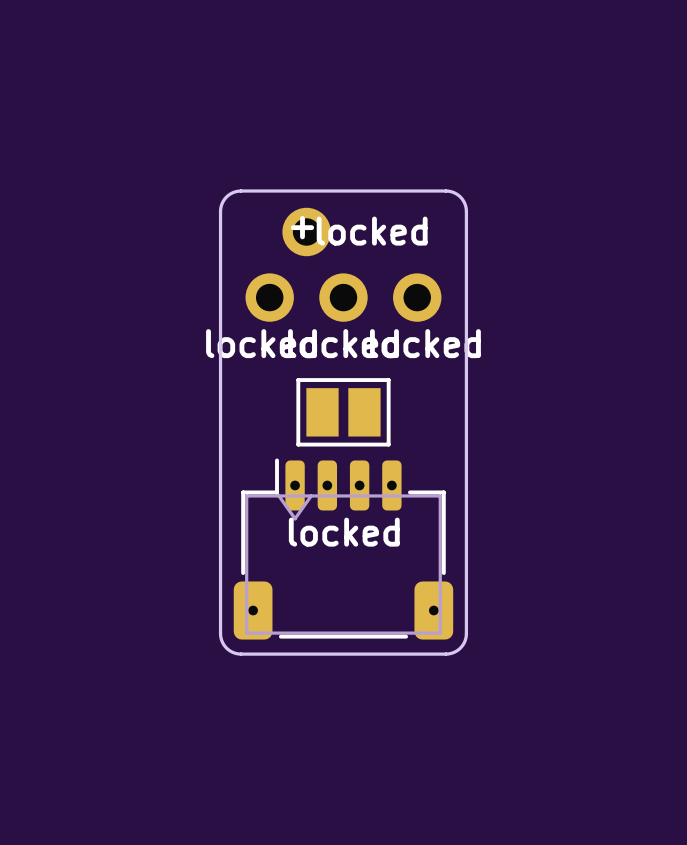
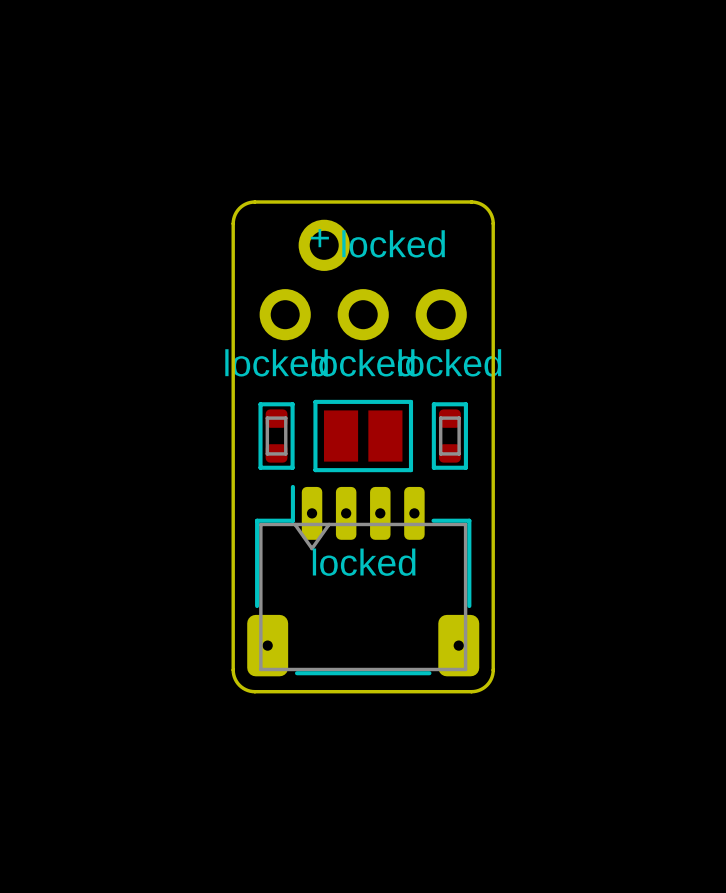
part: none -> (276, 436)
part: none -> (449, 436)

